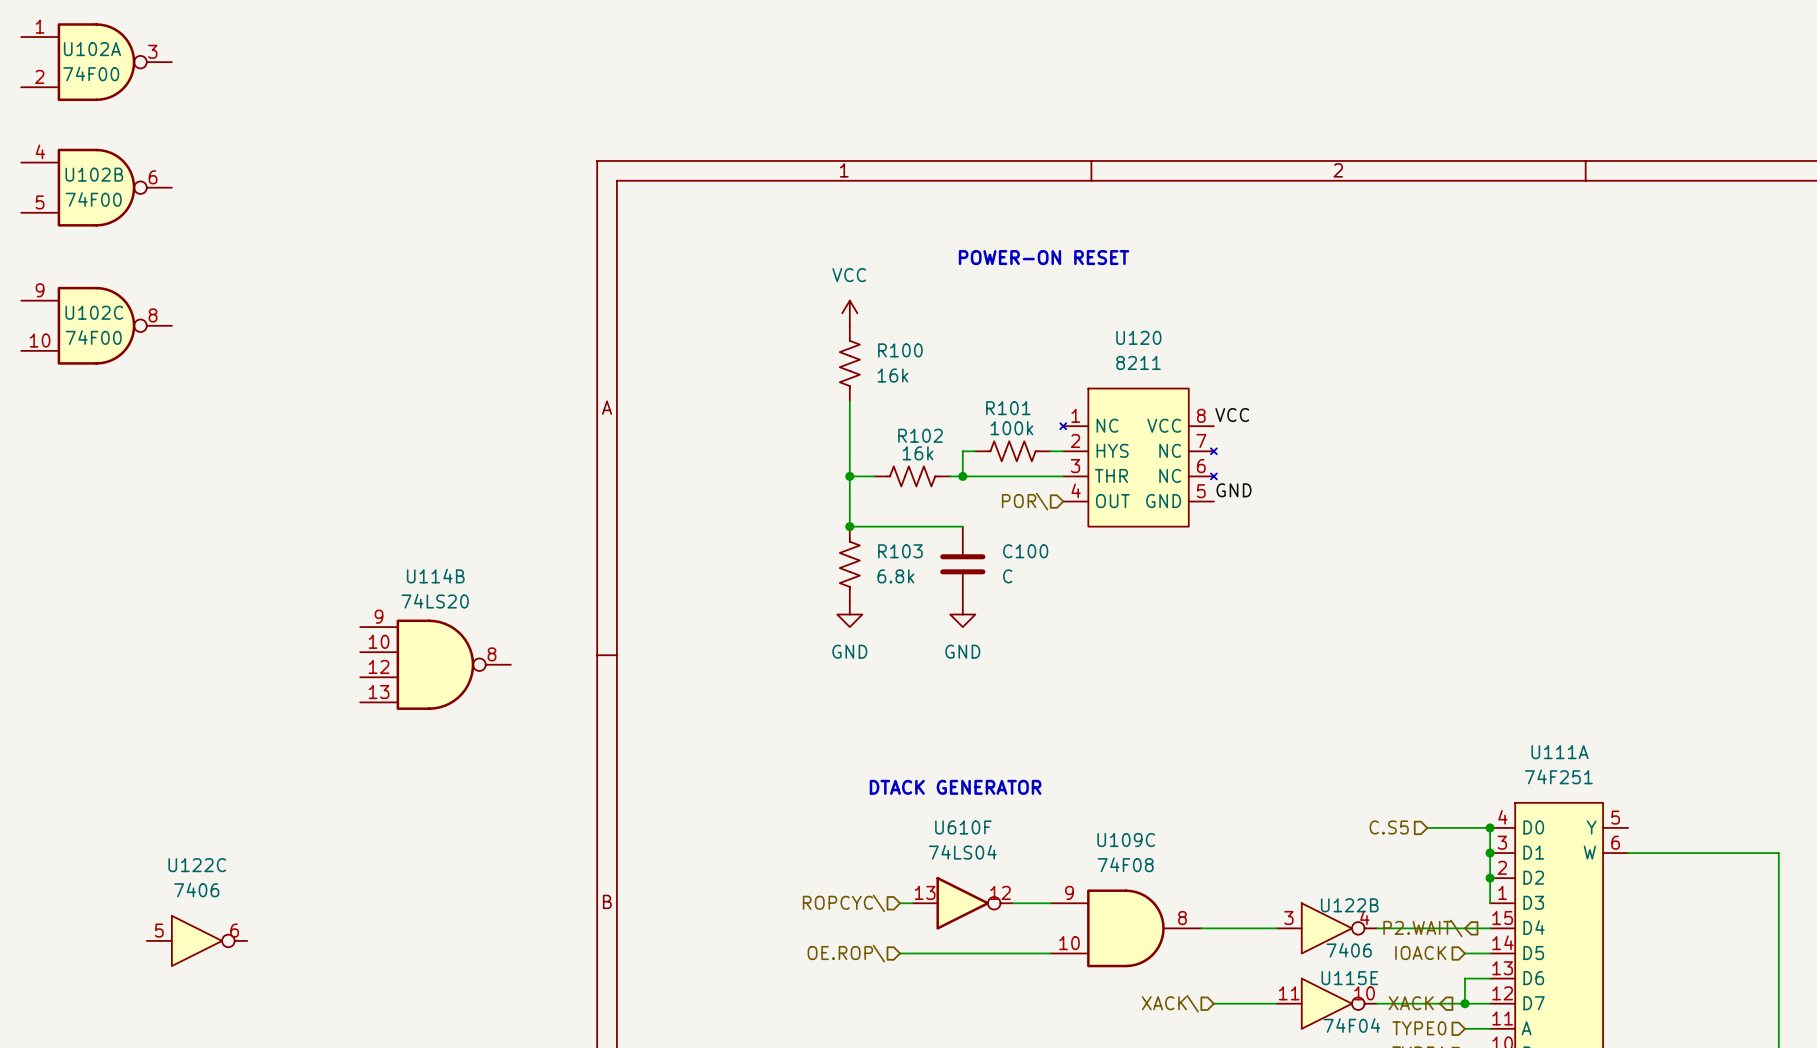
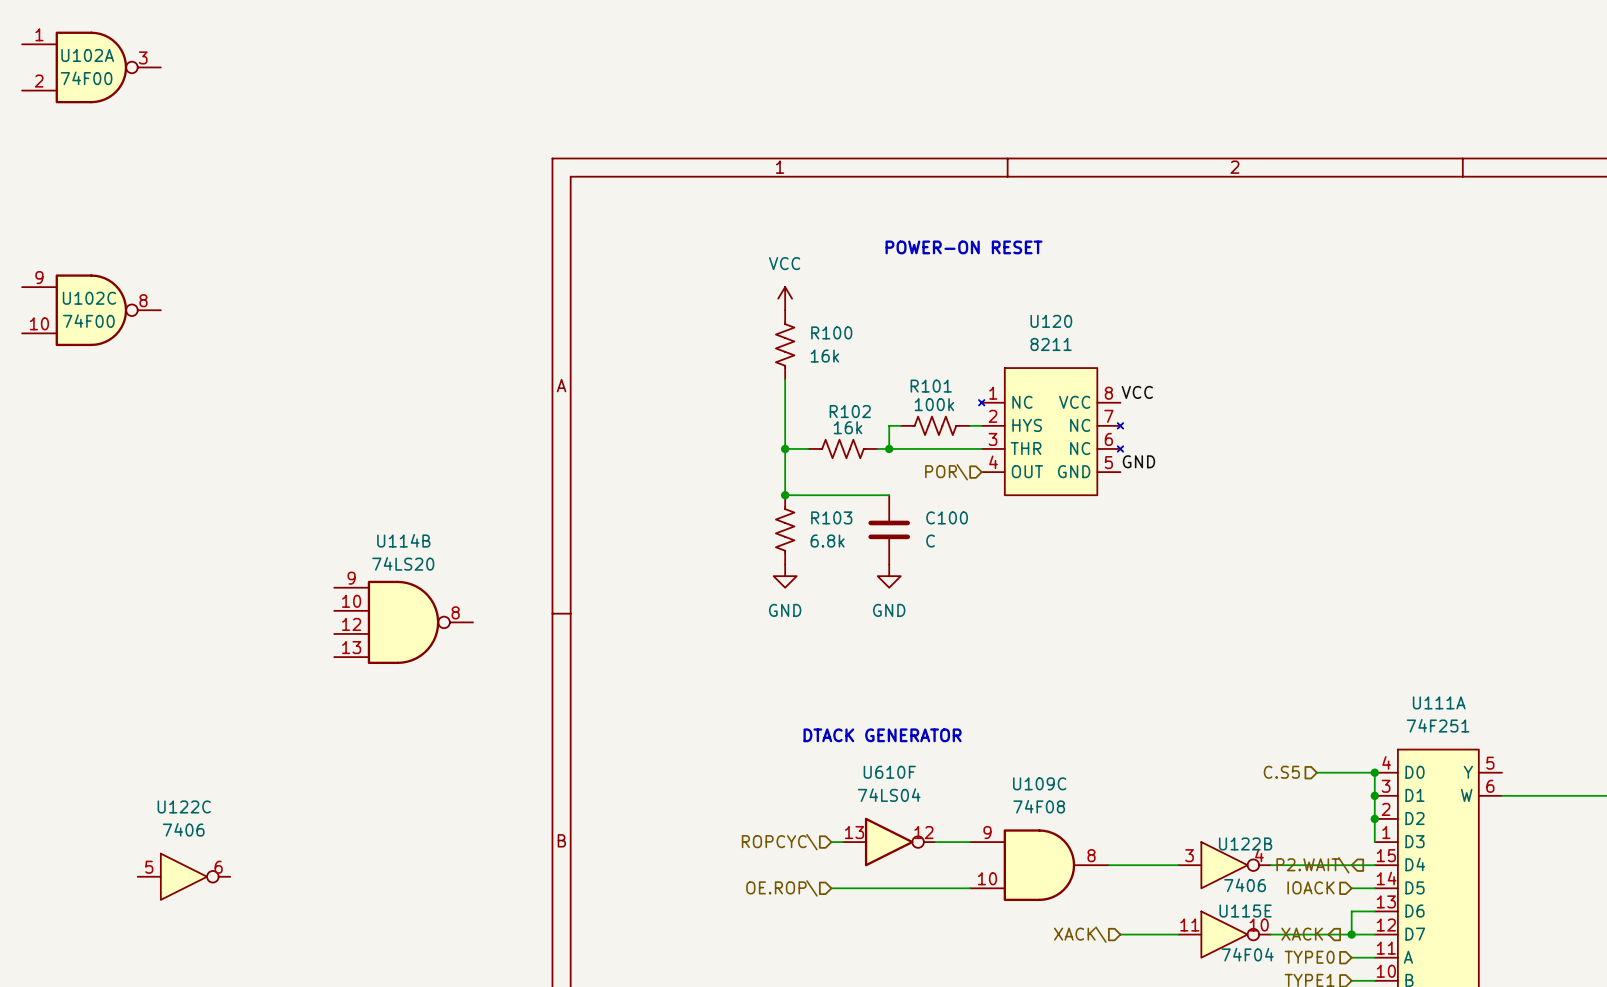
U102B: 74F00 (96, 187) -> none

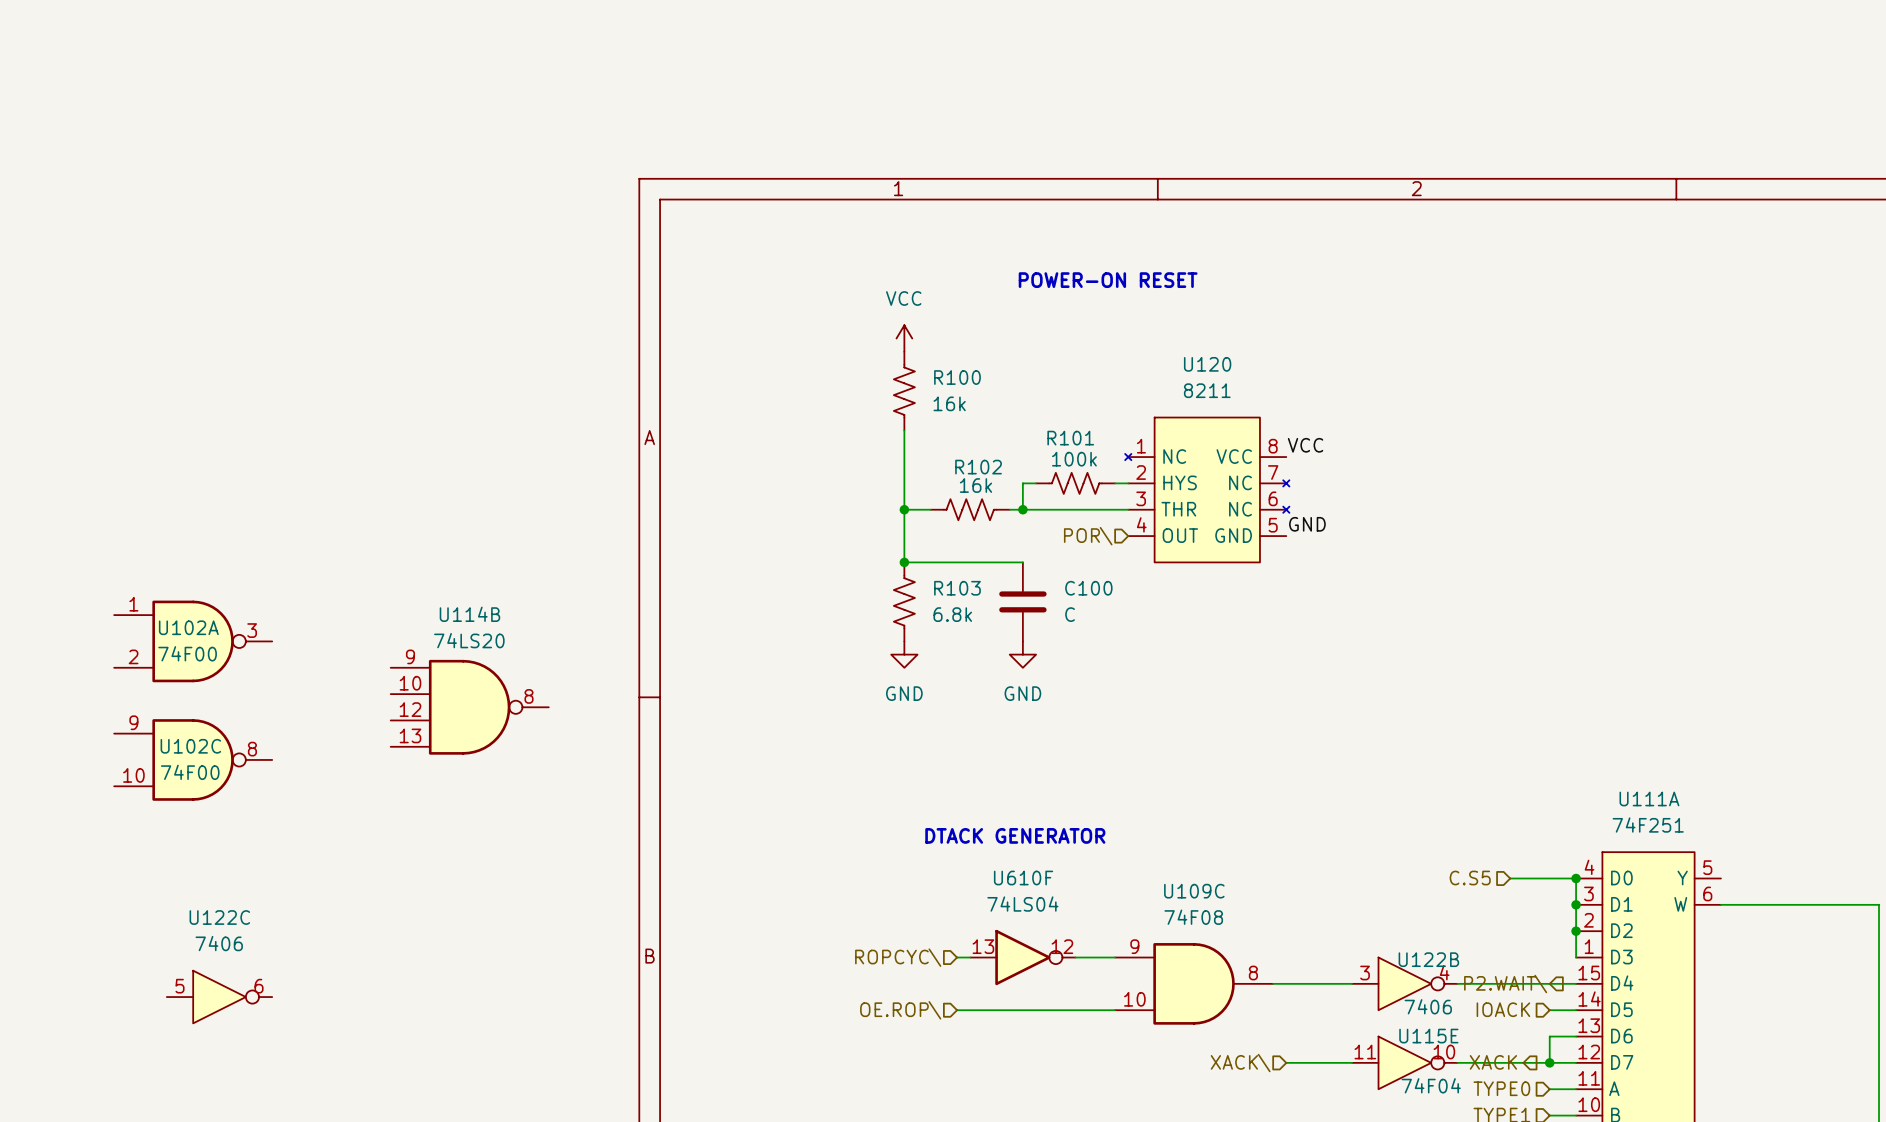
U102A position: (91, 67) -> (193, 641)
U102C position: (91, 310) -> (193, 759)

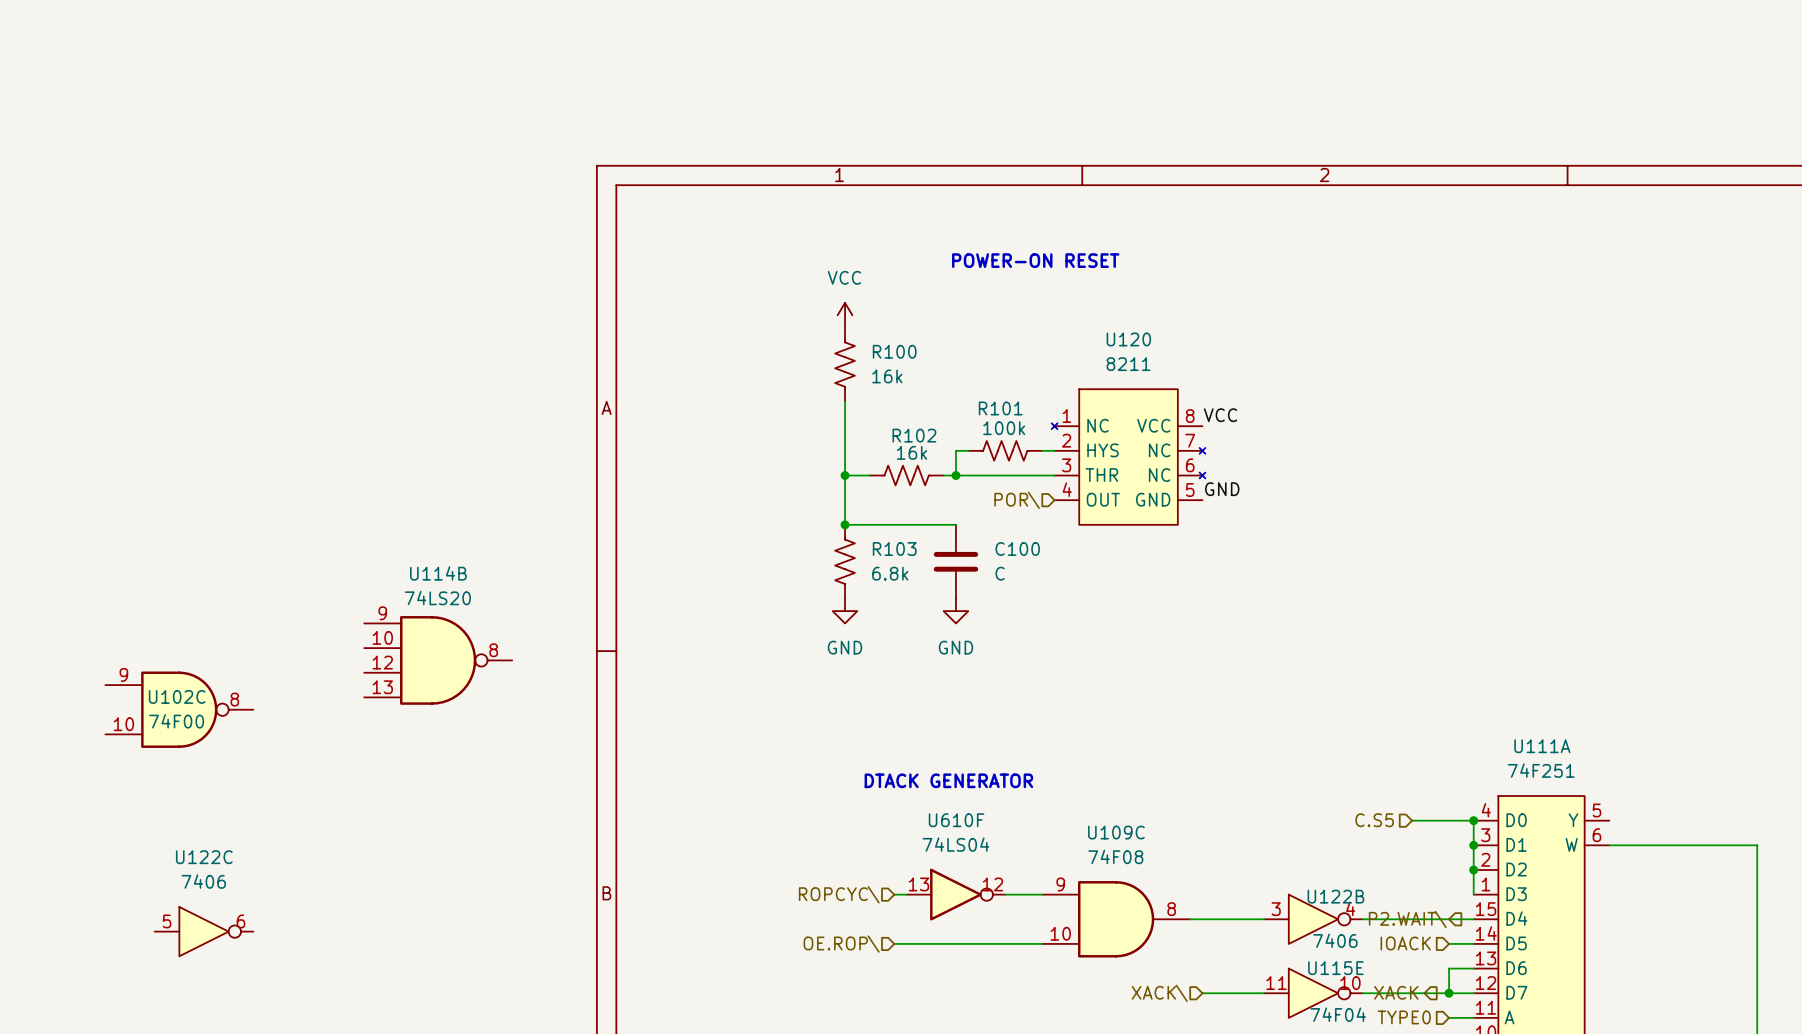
U102A: 74F00 (193, 641) -> none

